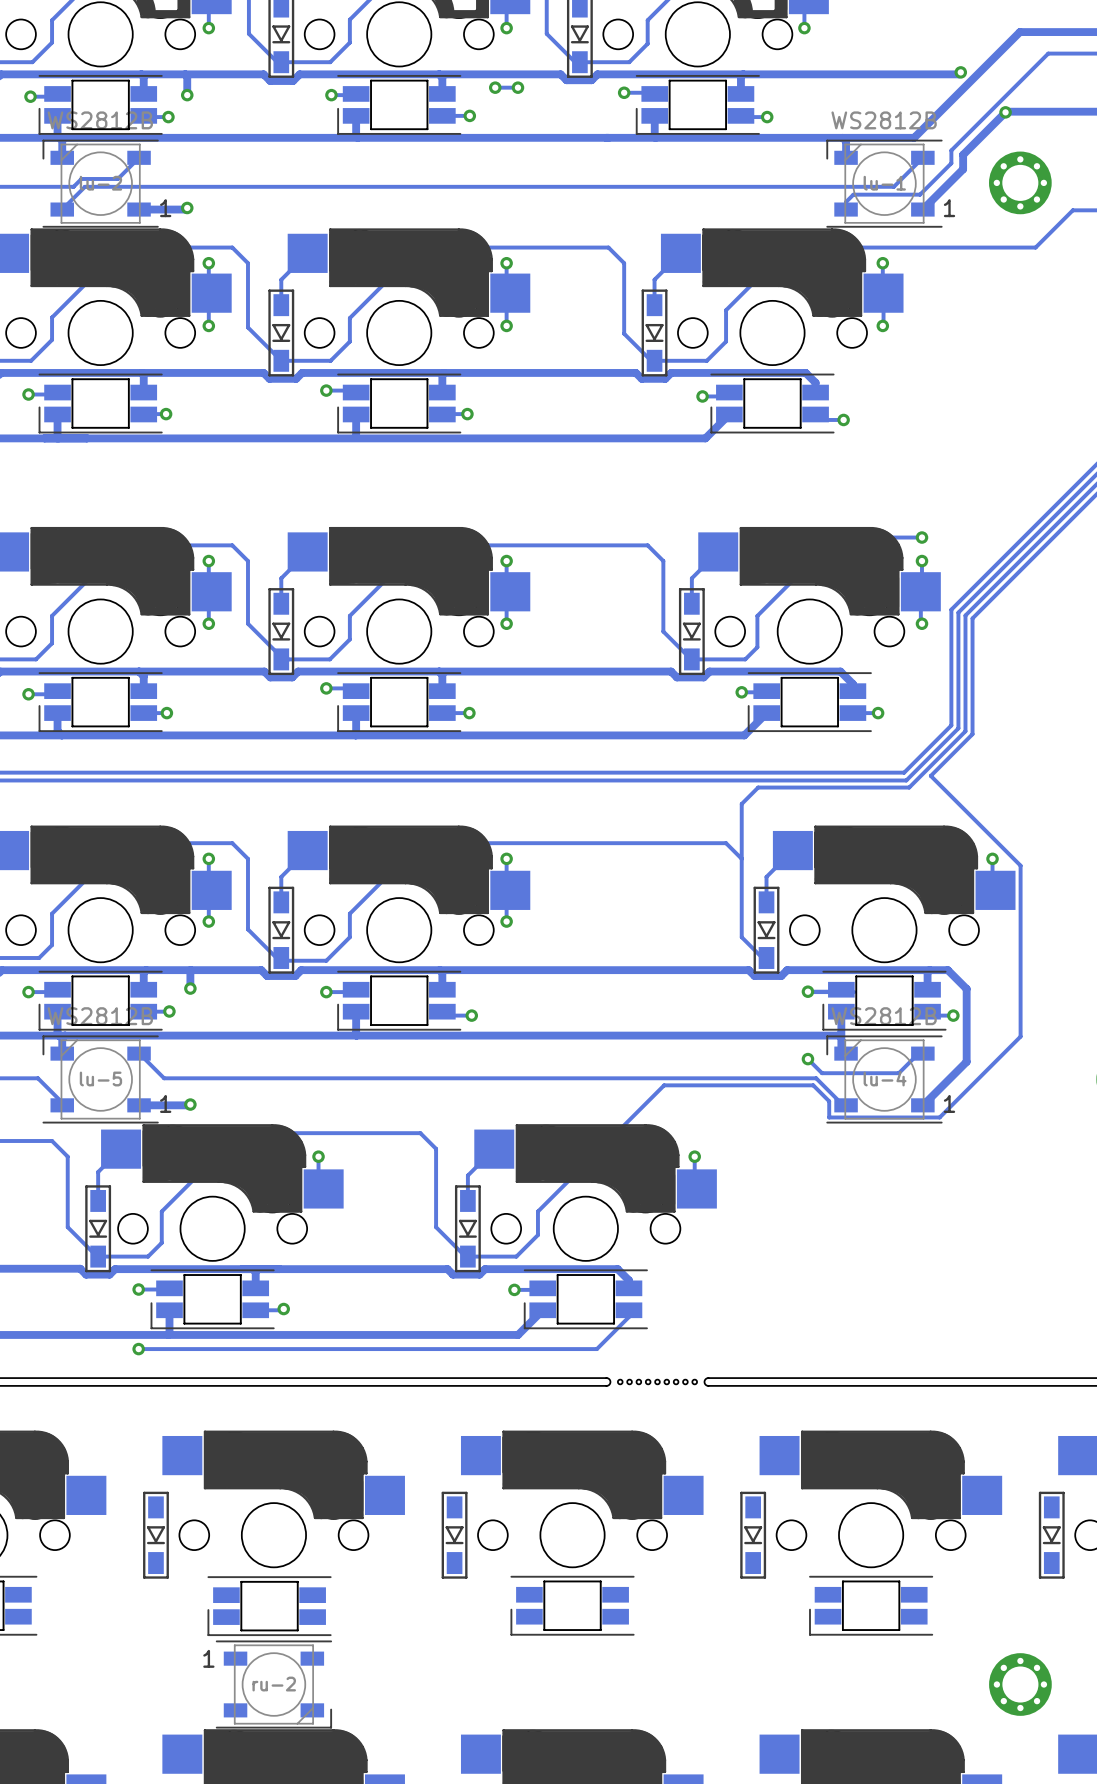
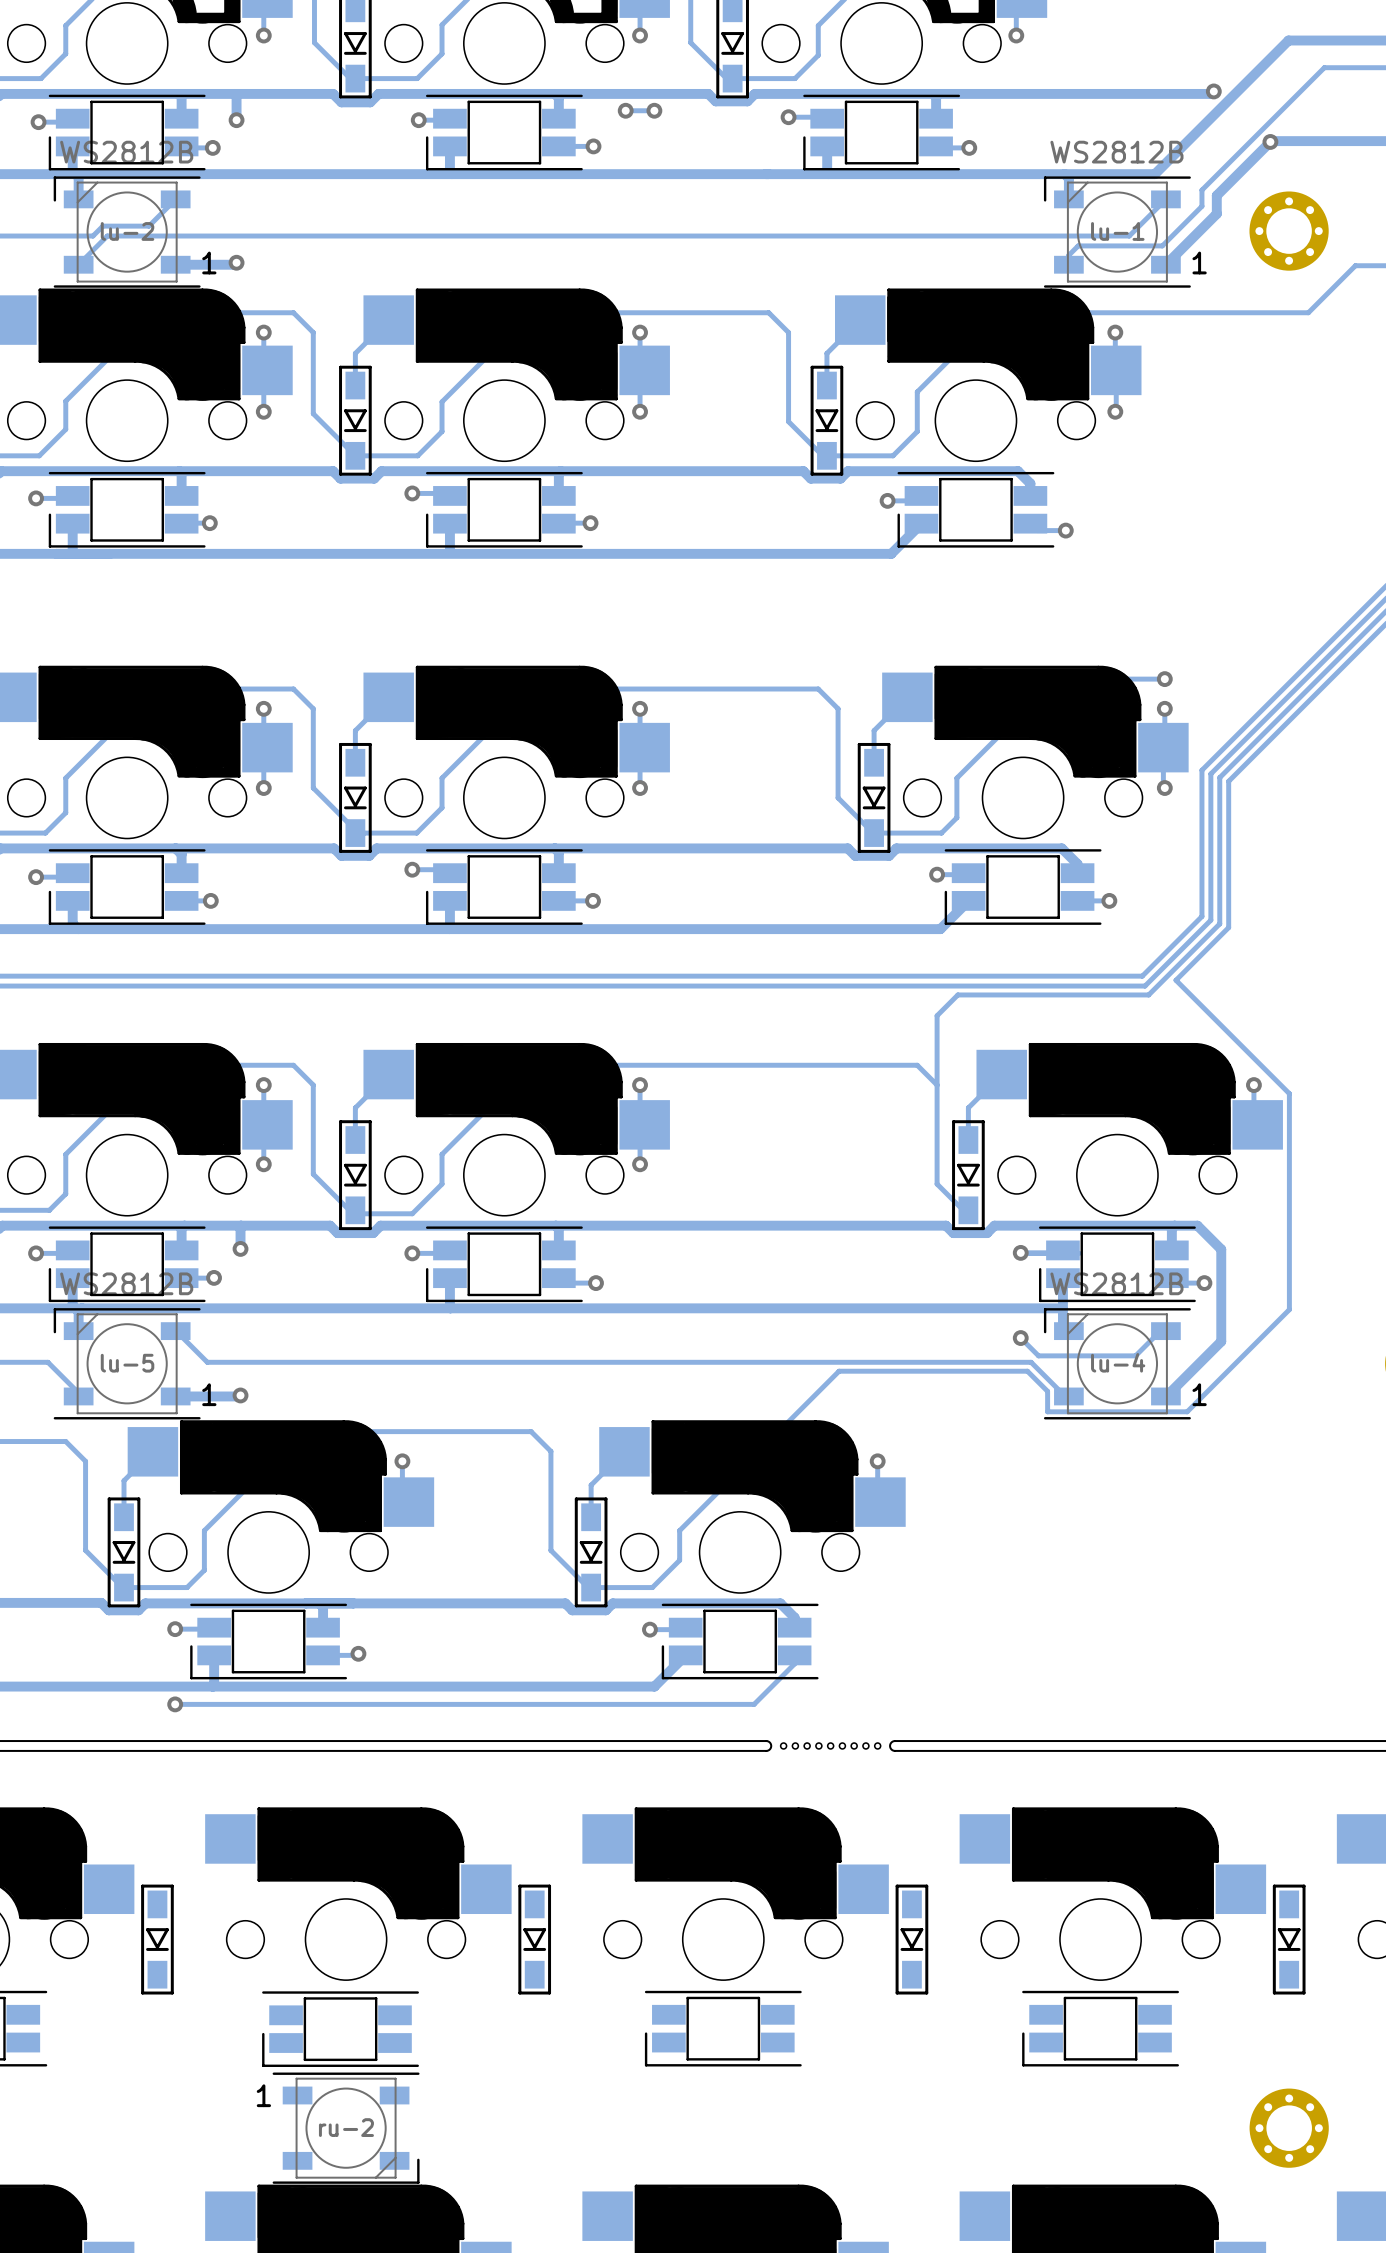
part position: (155, 1535) -> (157, 1939)
part position: (454, 1535) -> (534, 1939)
part position: (753, 1535) -> (911, 1939)
part position: (1051, 1535) -> (1289, 1939)

